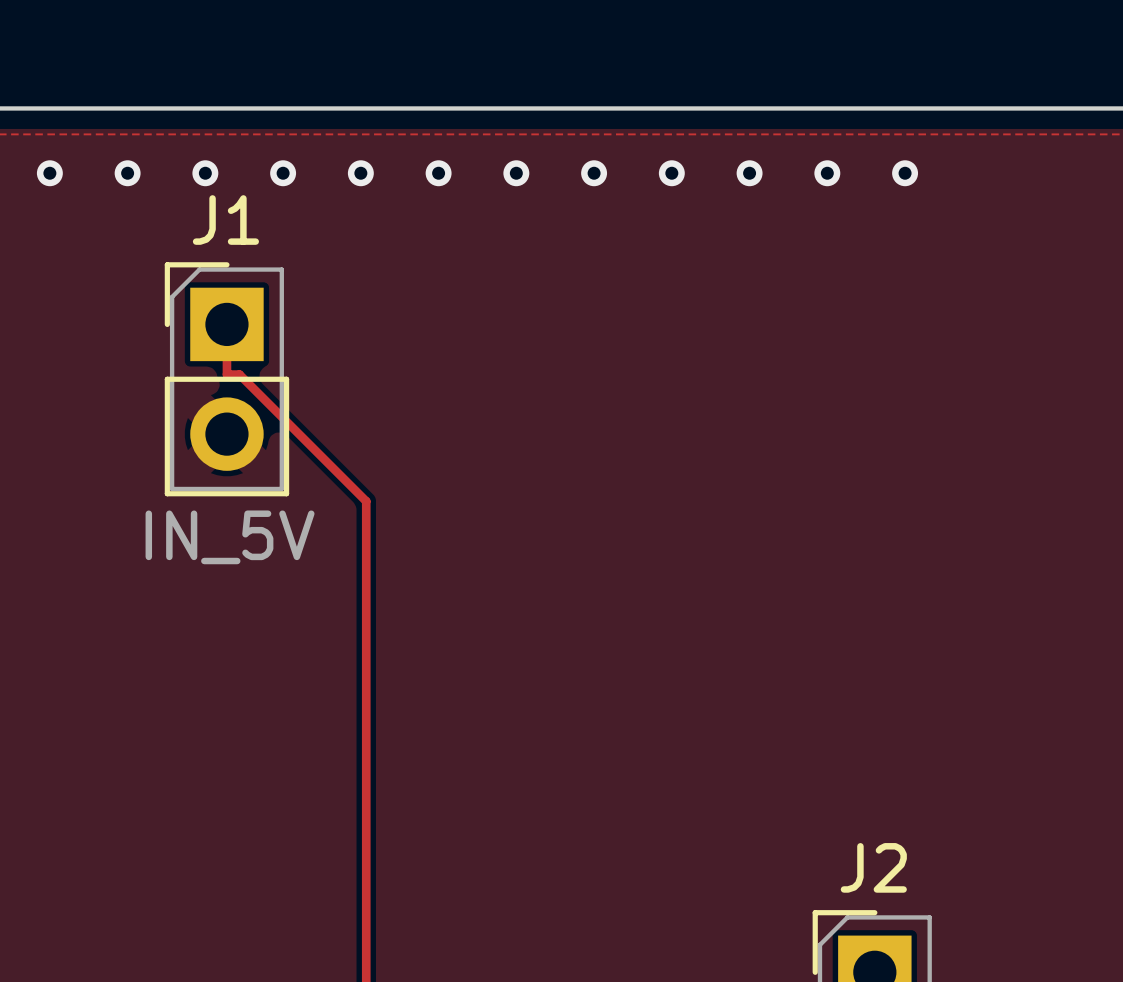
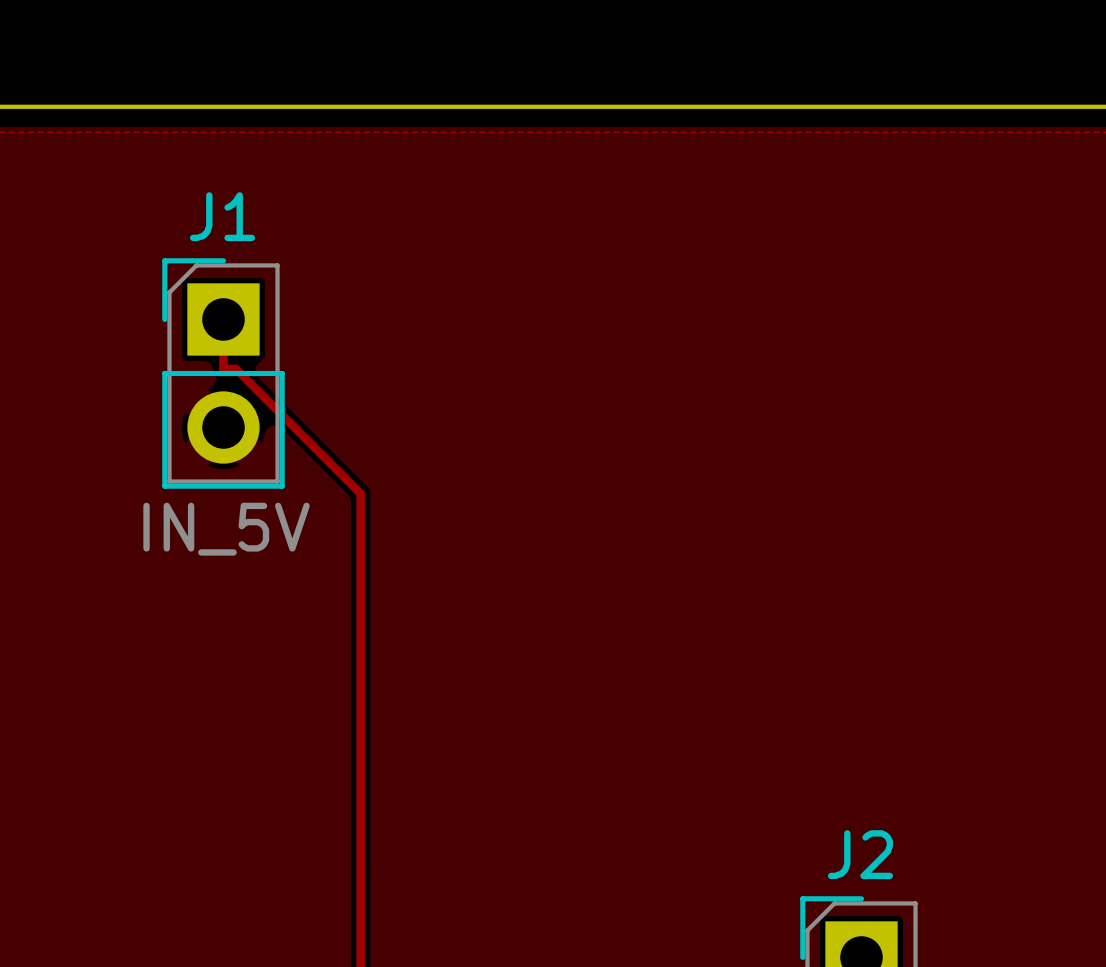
via: (49, 173) -> none
via: (127, 173) -> none
via: (205, 173) -> none
via: (283, 173) -> none
via: (360, 173) -> none
via: (438, 173) -> none
via: (516, 173) -> none
via: (594, 173) -> none
via: (671, 173) -> none
via: (749, 173) -> none
via: (827, 173) -> none
via: (905, 173) -> none

